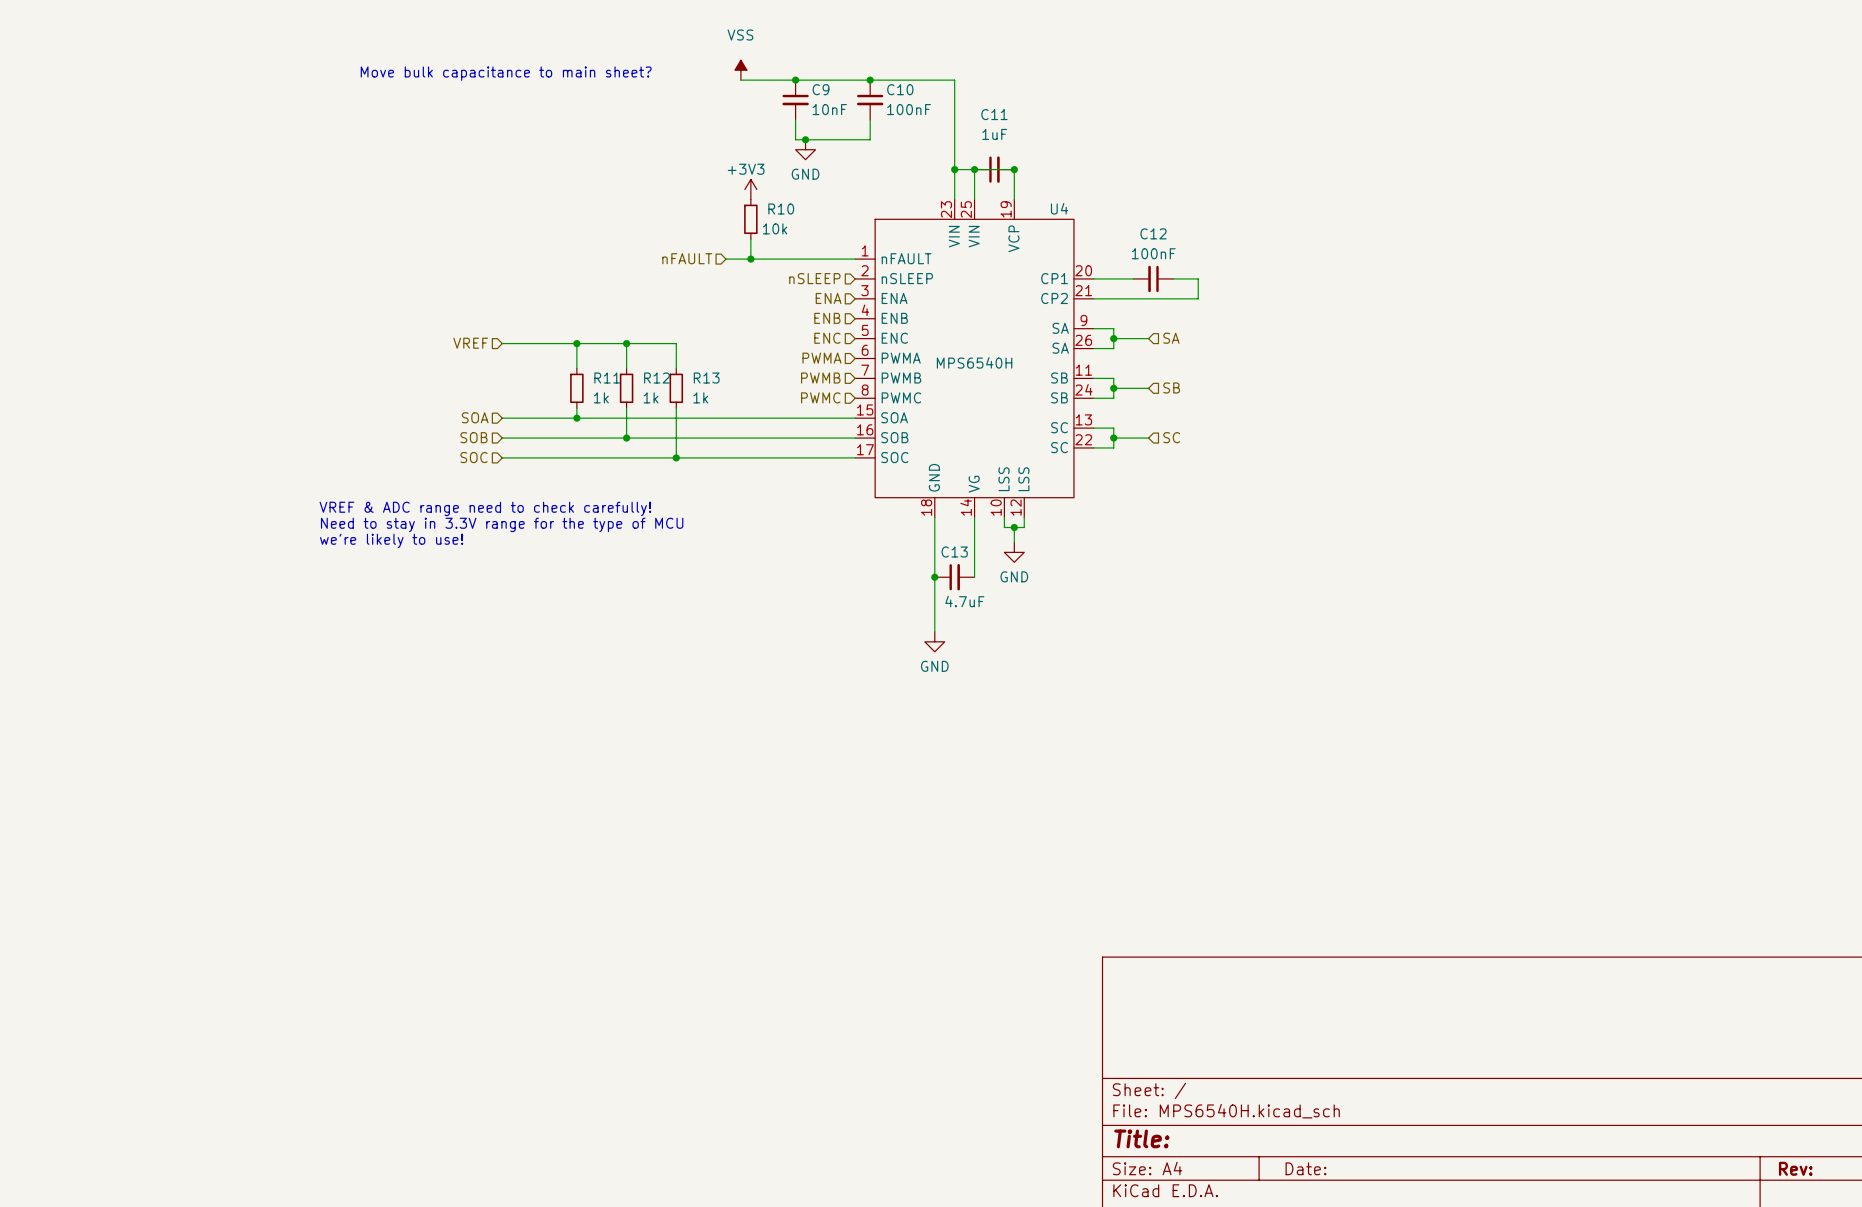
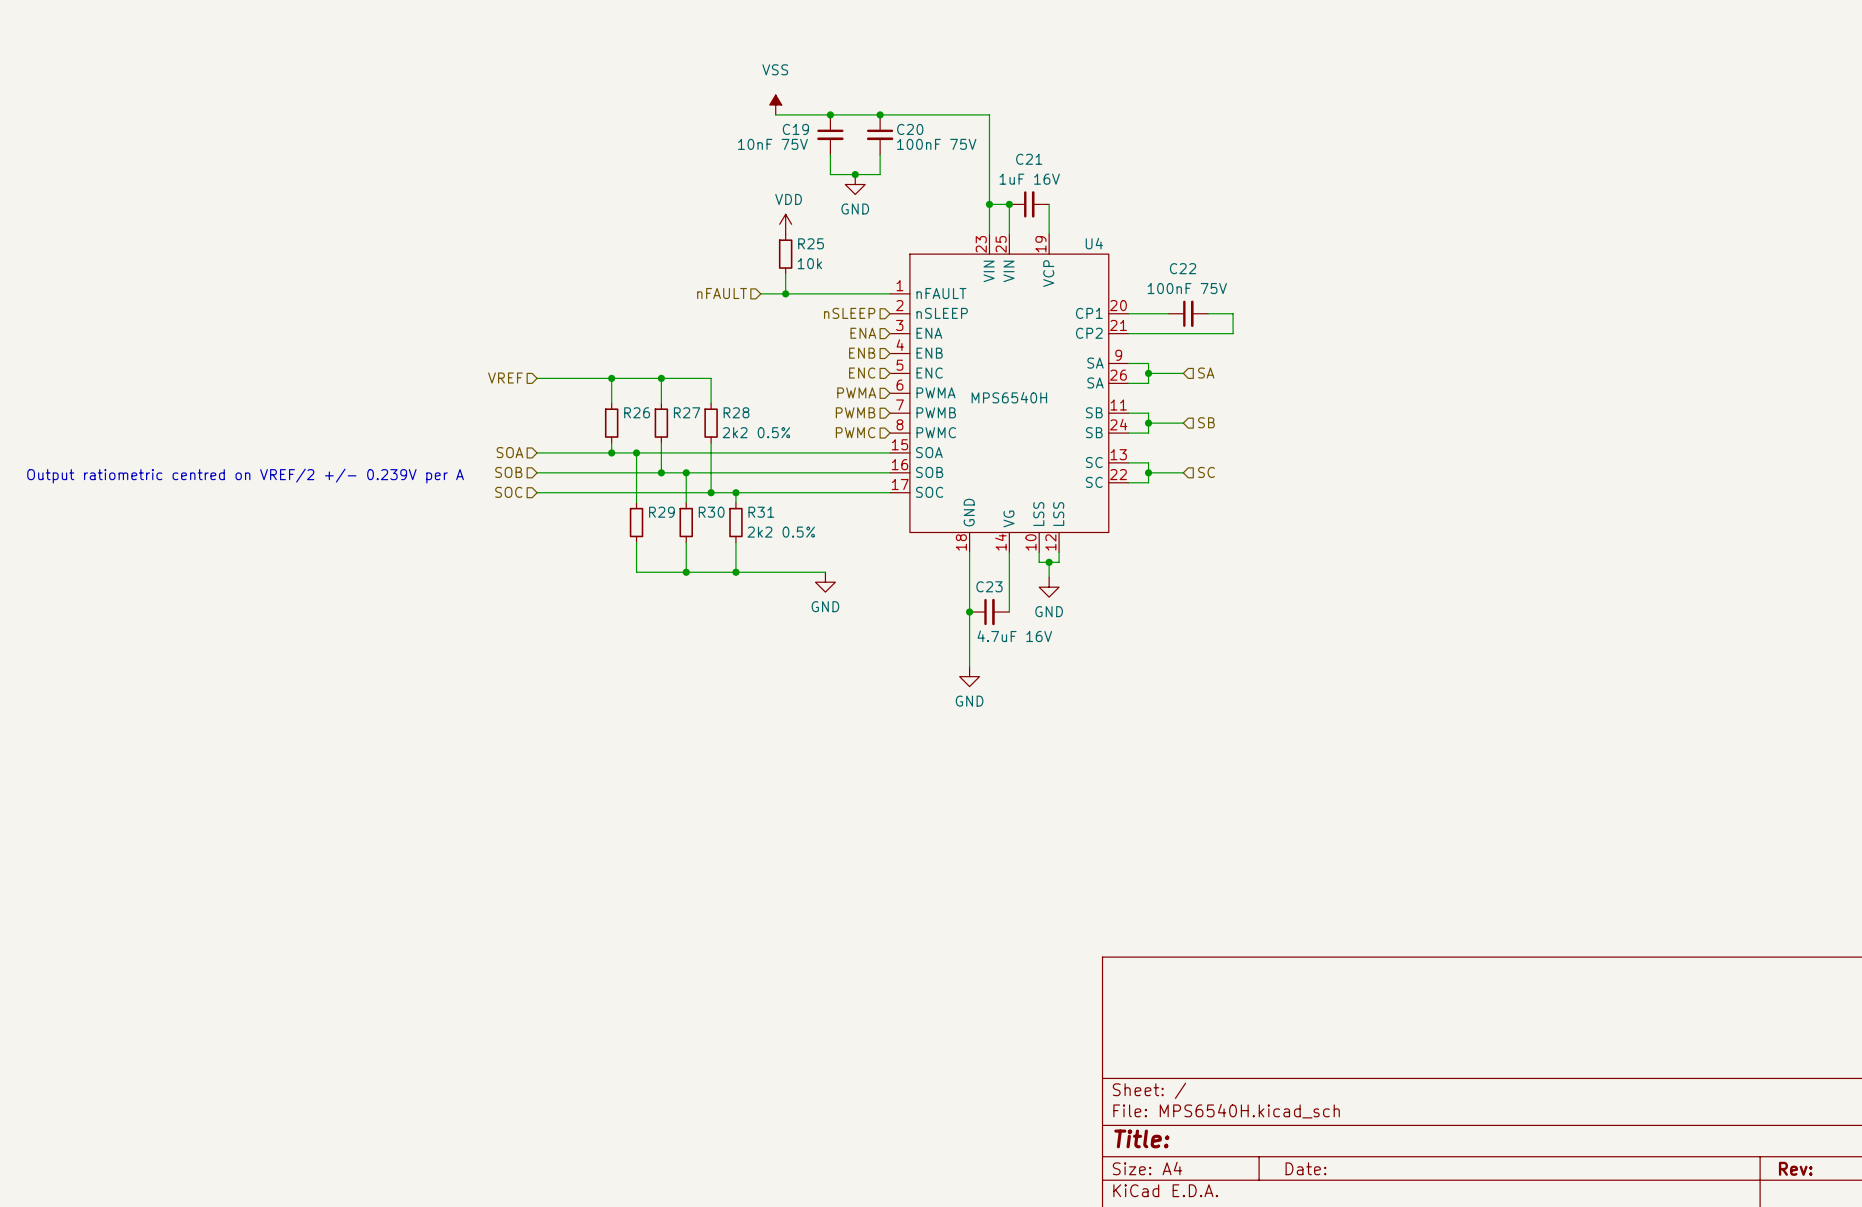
power symbol position: VSS (740, 70) -> VSS (775, 104)
text: Move bulk capacitance to main sheet? (506, 73) -> none
wire: (740, 80) (954, 80) (954, 199) -> (775, 114) (989, 114) (989, 234)
junction: (795, 80) -> none
junction: (870, 80) -> none
C9: 10nF (795, 100) -> none
C10: 100nF (870, 100) -> none
junction: none -> (830, 114)
junction: none -> (880, 114)
wire: (795, 119) (795, 139) (870, 139) (870, 119) -> none
C19: none -> 10nF 75V (830, 134)
C20: none -> 100nF 75V (880, 134)
junction: (805, 139) -> none
power symbol position: GND (805, 149) -> GND (855, 184)
wire: none -> (830, 154) (830, 174) (880, 174) (880, 154)
wire: (954, 169) (1014, 169) (1014, 199) -> none
junction: (954, 169) -> none
wire: (974, 169) (974, 199) -> (1049, 204) (1049, 234)
junction: (974, 169) -> none
C11: 1uF (994, 169) -> none
junction: (1014, 169) -> none
junction: none -> (855, 174)
power symbol: +3V3 (750, 189) -> none
wire: none -> (989, 204) (1009, 204) (1009, 234)
junction: none -> (989, 204)
junction: none -> (1009, 204)
C21: none -> 1uF 16V (1029, 204)
R10: 10k (750, 219) -> none
power symbol: none -> VDD (785, 224)
wire: (750, 239) (750, 259) -> (785, 274) (785, 293)
R25: none -> 10k (785, 254)
hierarchical label position: nFAULT (687, 258) -> nFAULT (722, 293)
wire: (726, 259) (855, 259) -> (760, 293) (890, 293)
junction: (750, 259) -> none
hierarchical label position: nSLEEP (814, 278) -> nSLEEP (849, 313)
wire: (1093, 278) (1133, 278) -> (1128, 313) (1168, 313)
C12: 100nF (1153, 278) -> none
wire: (1173, 278) (1198, 278) (1198, 298) (1093, 298) -> (1208, 313) (1233, 313) (1233, 333) (1128, 333)
junction: none -> (785, 293)
hierarchical label position: ENA (828, 298) -> ENA (863, 333)
C22: none -> 100nF 75V (1188, 313)
hierarchical label position: ENB (827, 318) -> ENB (862, 353)
wire: (1093, 328) (1113, 328) (1113, 348) (1093, 348) -> (1128, 363) (1148, 363) (1148, 383) (1128, 383)
hierarchical label position: ENC (827, 338) -> ENC (862, 373)
wire: (1113, 338) (1148, 338) -> (1148, 373) (1183, 373)
junction: (1113, 338) -> none
hierarchical label position: SA (1171, 338) -> SA (1206, 373)
hierarchical label position: VREF (470, 343) -> VREF (505, 378)
wire: (502, 343) (676, 343) (676, 368) -> (537, 378) (711, 378) (711, 403)
wire: (576, 343) (576, 368) -> (611, 378) (611, 403)
junction: (576, 343) -> none
wire: (626, 343) (626, 368) -> (661, 378) (661, 403)
junction: (626, 343) -> none
hierarchical label position: PWMA (821, 358) -> PWMA (856, 392)
U4 position: (974, 358) -> (1009, 393)
junction: none -> (1148, 373)
junction: none -> (611, 378)
junction: none -> (661, 378)
hierarchical label position: PWMB (820, 378) -> PWMB (855, 412)
wire: (1093, 378) (1113, 378) (1113, 398) (1093, 398) -> (1128, 413) (1148, 413) (1148, 433) (1128, 433)
hierarchical label position: SB (1171, 387) -> SB (1206, 422)
R11: 1k (576, 388) -> none
R12: 1k (626, 388) -> none
R13: 1k (676, 388) -> none
wire: (1113, 388) (1148, 388) -> (1148, 423) (1183, 423)
junction: (1113, 388) -> none
hierarchical label position: PWMC (820, 397) -> PWMC (855, 432)
wire: (576, 408) (576, 418) -> (611, 443) (611, 452)
wire: (626, 408) (626, 438) -> (661, 443) (661, 472)
wire: (676, 408) (676, 457) -> (711, 443) (711, 492)
hierarchical label position: SOA (475, 417) -> SOA (509, 452)
wire: (502, 418) (855, 418) -> (537, 452) (890, 452)
junction: (576, 418) -> none
R26: none -> (611, 423)
R27: none -> (661, 423)
R28: none -> 2k2 0.5% (711, 423)
junction: none -> (1148, 423)
wire: (1093, 428) (1113, 428) (1113, 447) (1093, 447) -> (1128, 462) (1148, 462) (1148, 482) (1128, 482)
hierarchical label position: SOB (473, 437) -> SOB (508, 472)
hierarchical label position: SC (1171, 437) -> SC (1206, 472)
wire: (502, 438) (855, 438) -> (537, 472) (890, 472)
junction: (626, 438) -> none
wire: (1113, 438) (1148, 438) -> (1148, 472) (1183, 472)
junction: (1113, 438) -> none
junction: none -> (611, 452)
wire: none -> (636, 452) (636, 502)
junction: none -> (636, 452)
hierarchical label position: SOC (473, 457) -> SOC (508, 492)
wire: (502, 457) (855, 457) -> (537, 492) (890, 492)
junction: (676, 457) -> none
junction: none -> (661, 472)
wire: none -> (686, 472) (686, 502)
junction: none -> (686, 472)
junction: none -> (1148, 472)
text: none -> Output ratiometric centred on VREF/2 +/- 0.239V per A (245, 476)
junction: none -> (711, 492)
wire: none -> (735, 492) (735, 502)
junction: none -> (735, 492)
text: VREF & ADC range need to check carefully! (485, 508) -> none
wire: (934, 517) (934, 631) -> (969, 552) (969, 666)
wire: (974, 517) (974, 577) -> (1009, 552) (1009, 612)
wire: (1004, 517) (1004, 527) (1024, 527) (1024, 517) -> (1039, 552) (1039, 562) (1059, 562) (1059, 552)
R29: none -> (636, 522)
R30: none -> (686, 522)
R31: none -> 2k2 0.5% (735, 522)
text: Need to stay in 3.3V range for the type of MCU (502, 524) -> none
wire: (1014, 527) (1014, 542) -> (1049, 562) (1049, 577)
junction: (1014, 527) -> none
text: we're likely to use! (391, 540) -> none
wire: none -> (636, 542) (636, 572) (825, 572)
wire: none -> (686, 542) (686, 572)
wire: none -> (735, 542) (735, 572)
power symbol position: GND (1014, 552) -> GND (1049, 587)
junction: none -> (1049, 562)
junction: none -> (686, 572)
junction: none -> (735, 572)
junction: (934, 577) -> none
C13: 4.7uF (954, 577) -> none
power symbol: none -> GND (825, 582)
junction: none -> (969, 612)
C23: none -> 4.7uF 16V (989, 612)
power symbol position: GND (934, 641) -> GND (969, 676)

